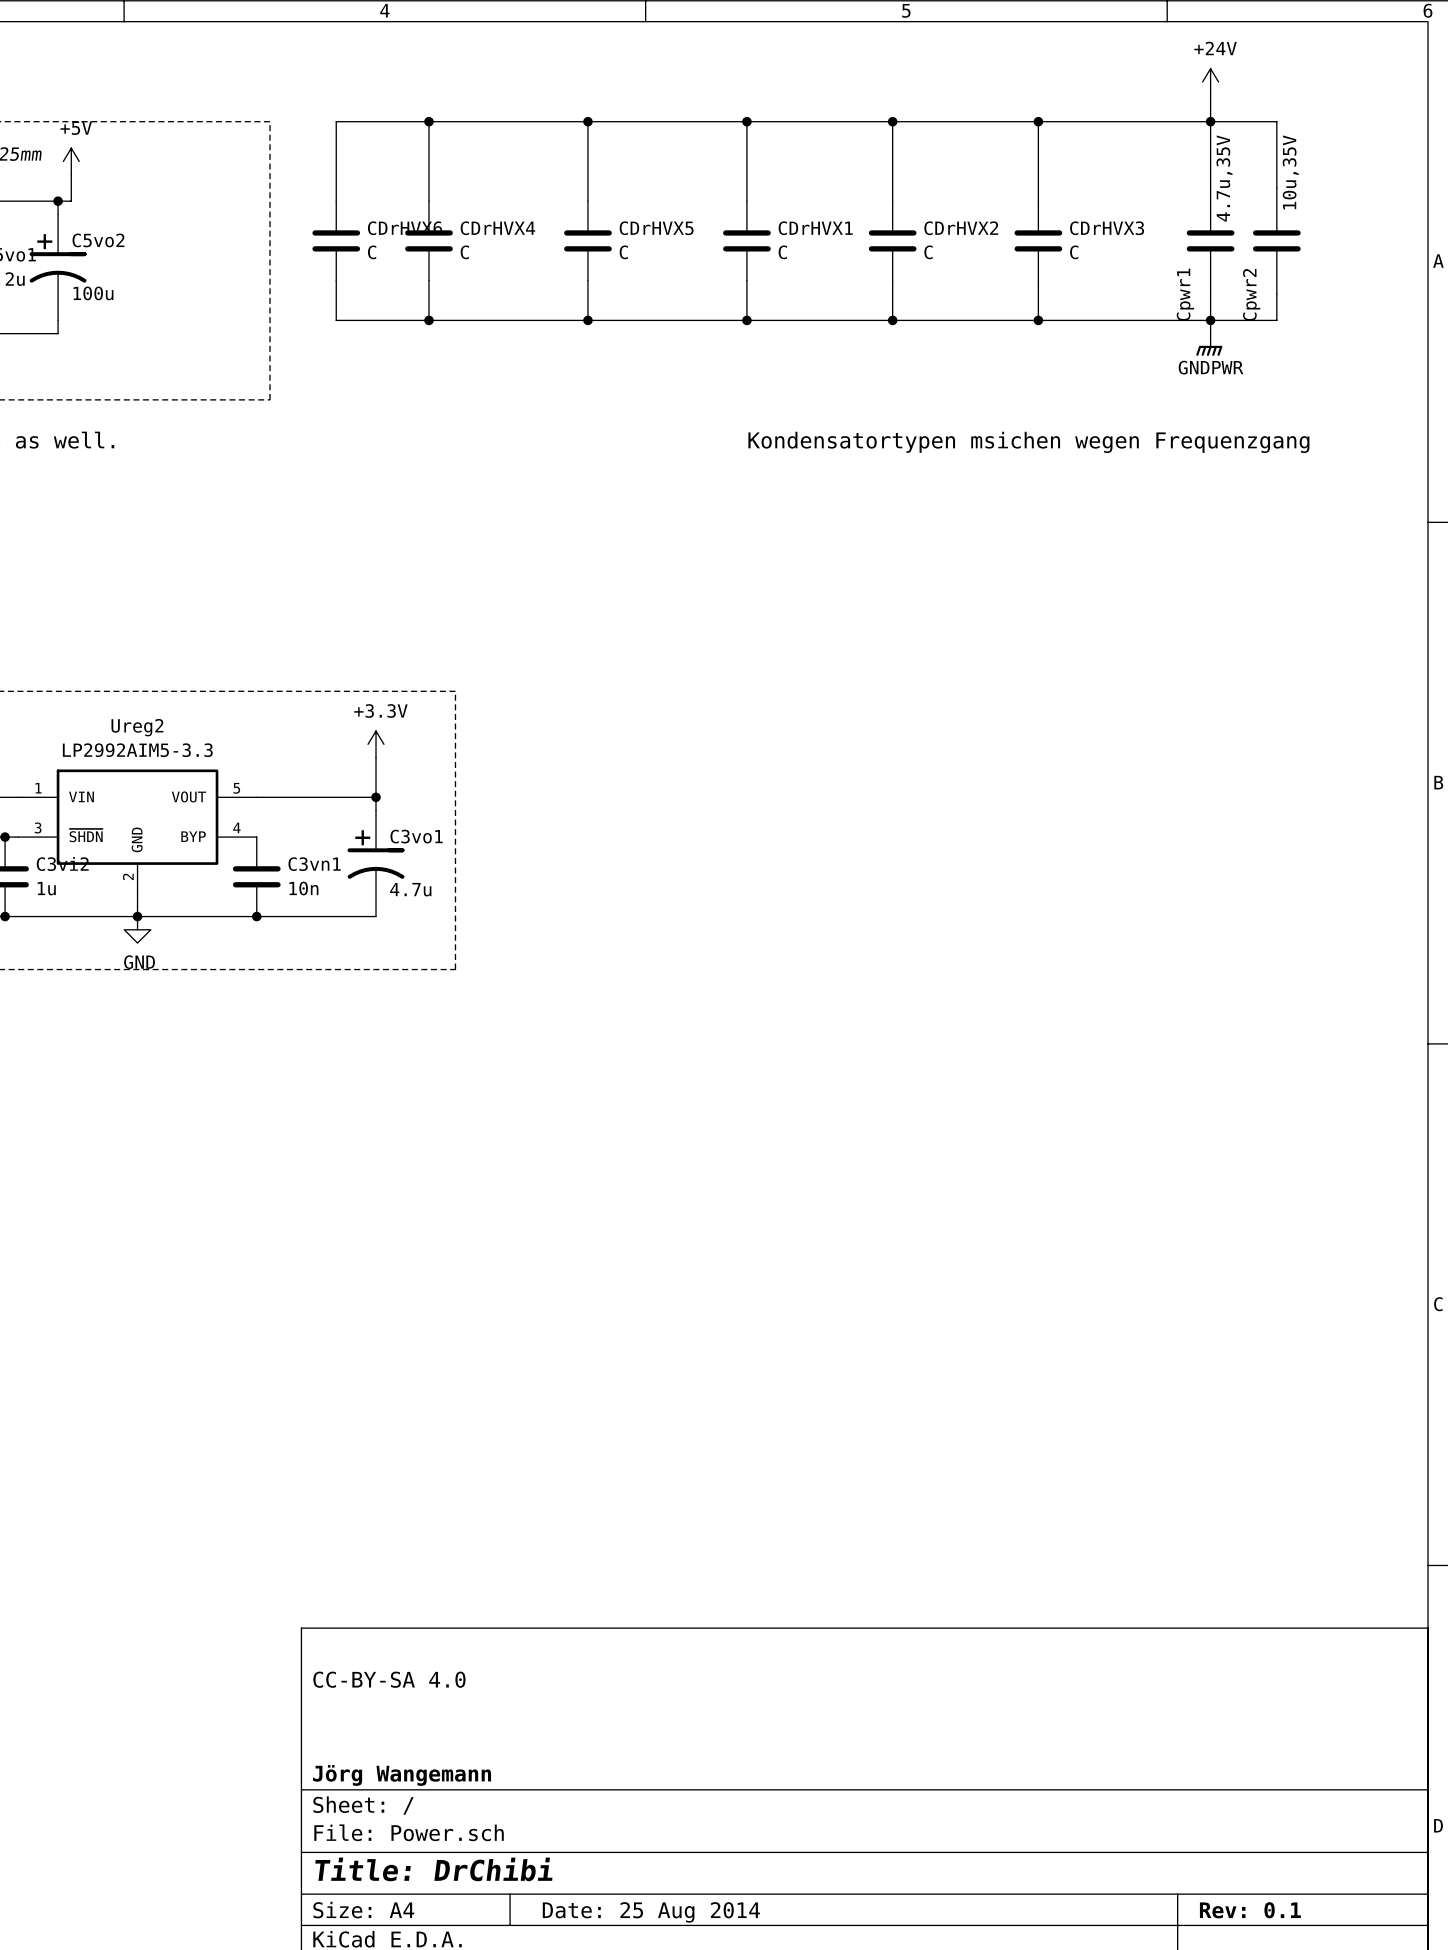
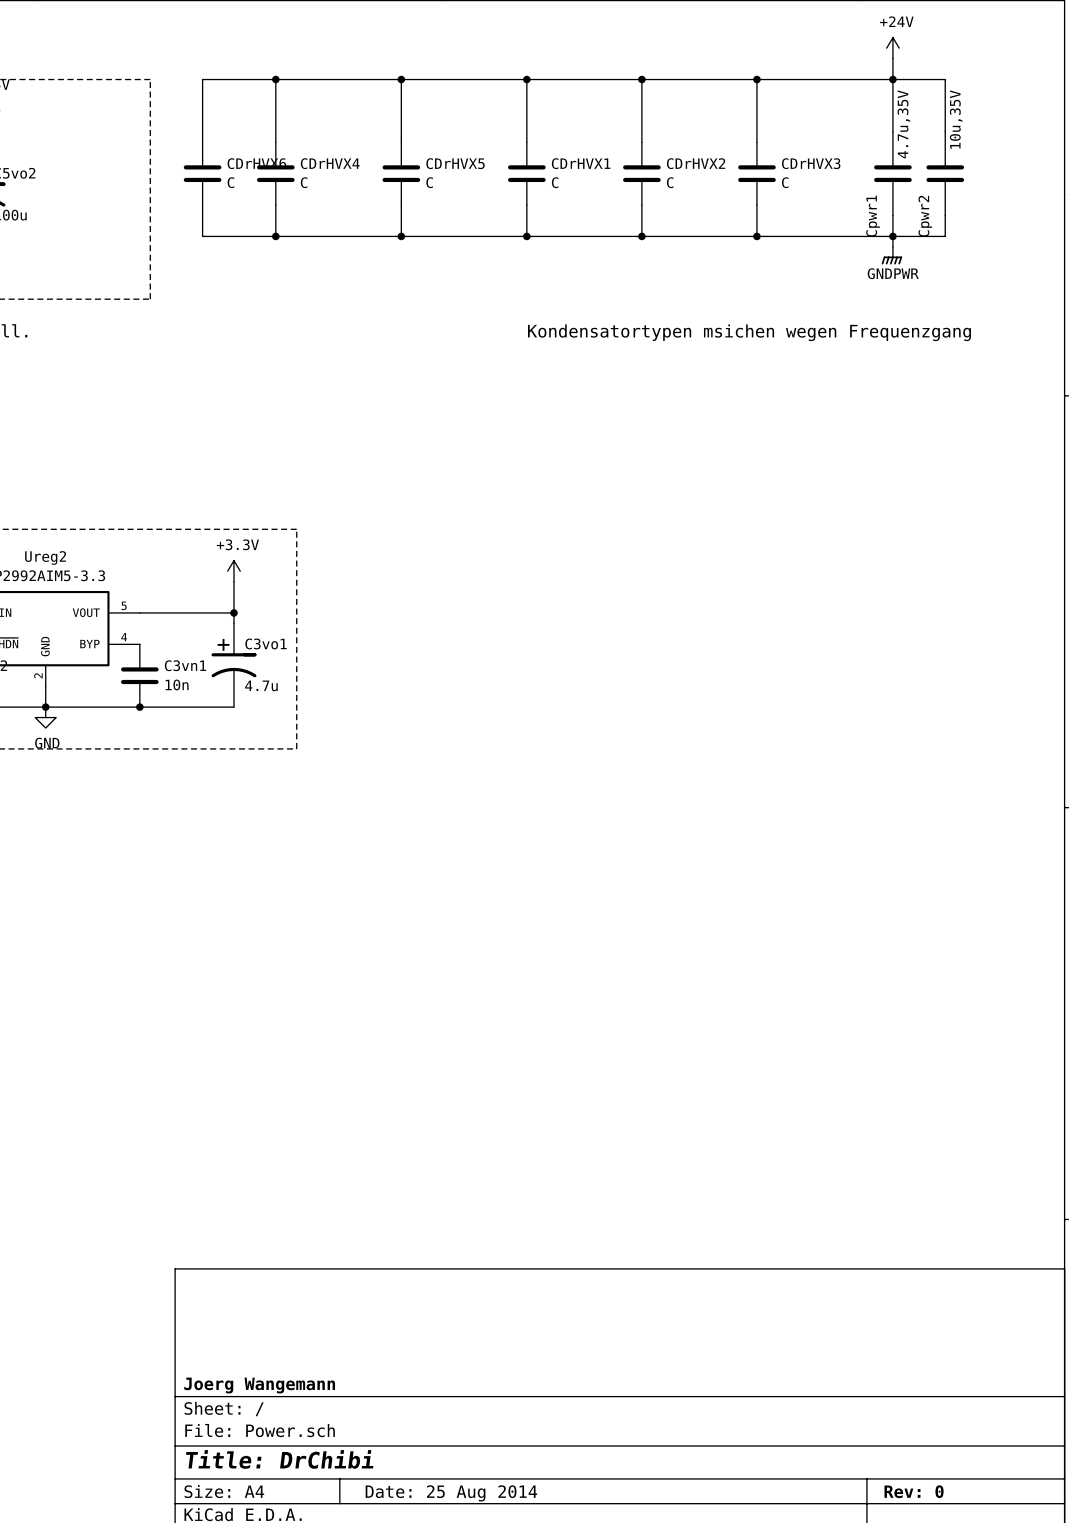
title block: CC-BY-SA 4.0 (389, 1679) -> none
title block: Jörg Wangemann (402, 1775) -> Joerg Wangemann (259, 1385)
title block: Rev: 0.1 (1250, 1910) -> Rev: 0 (914, 1491)

